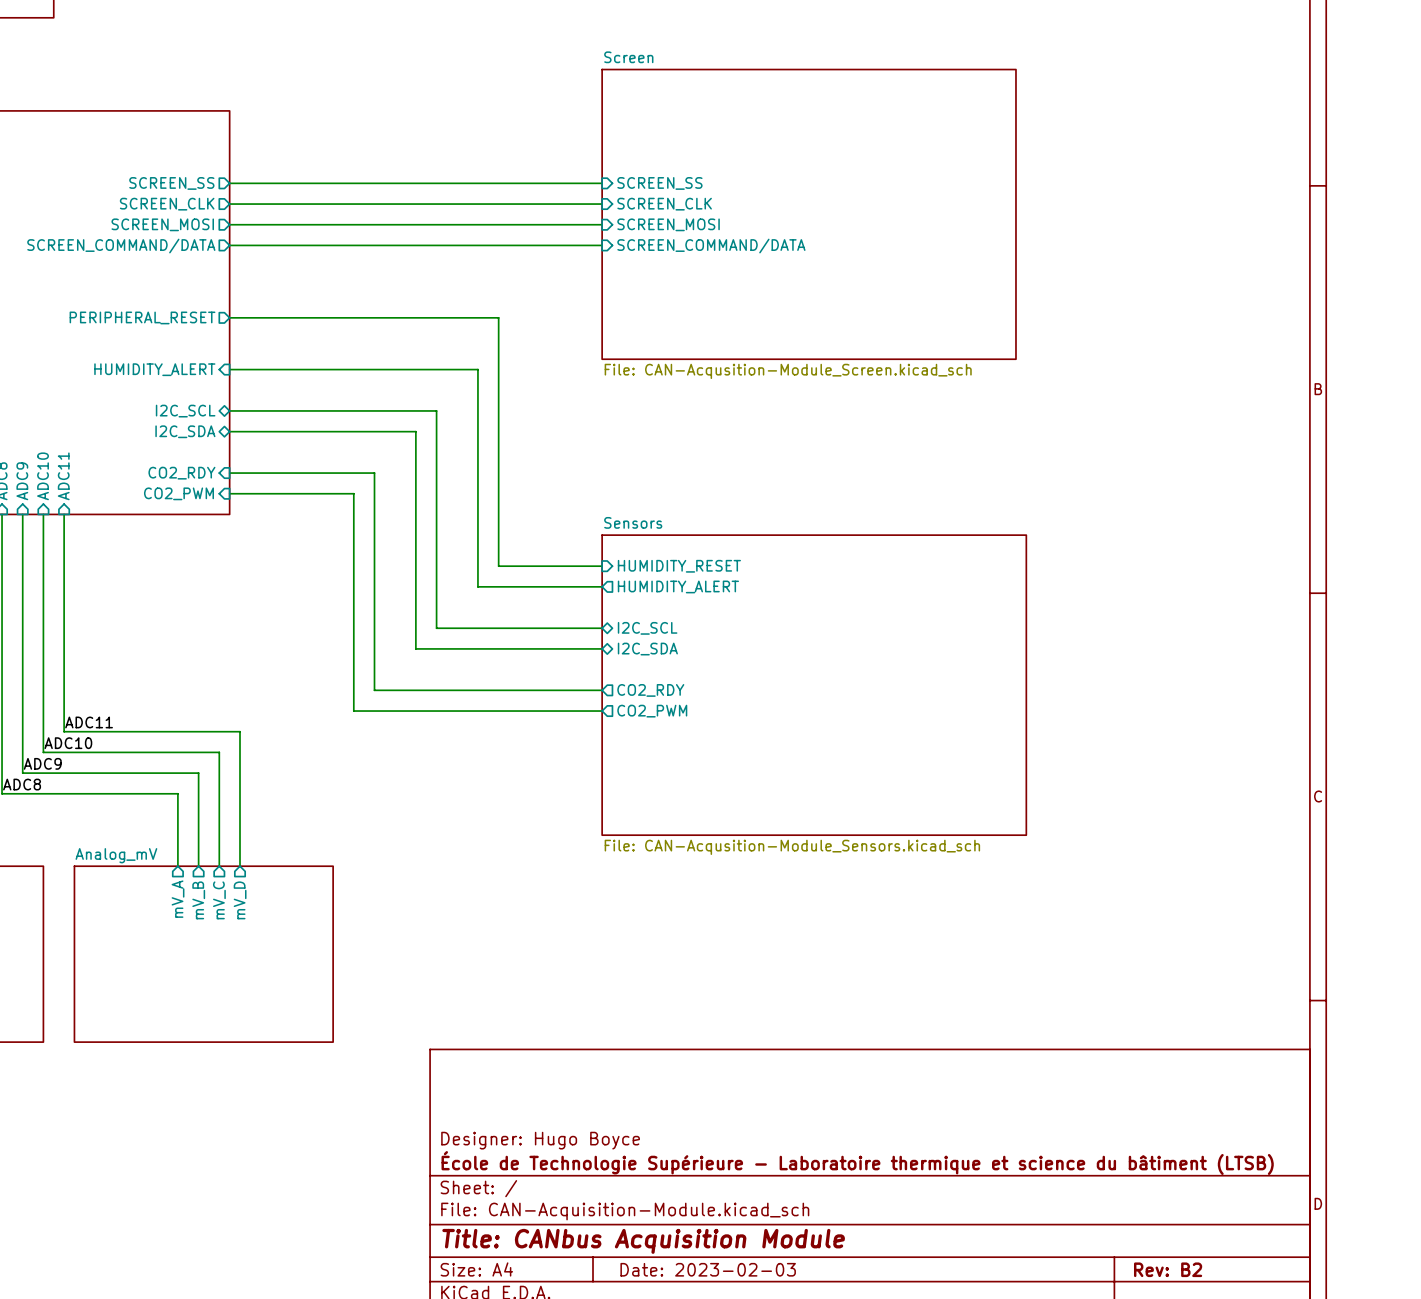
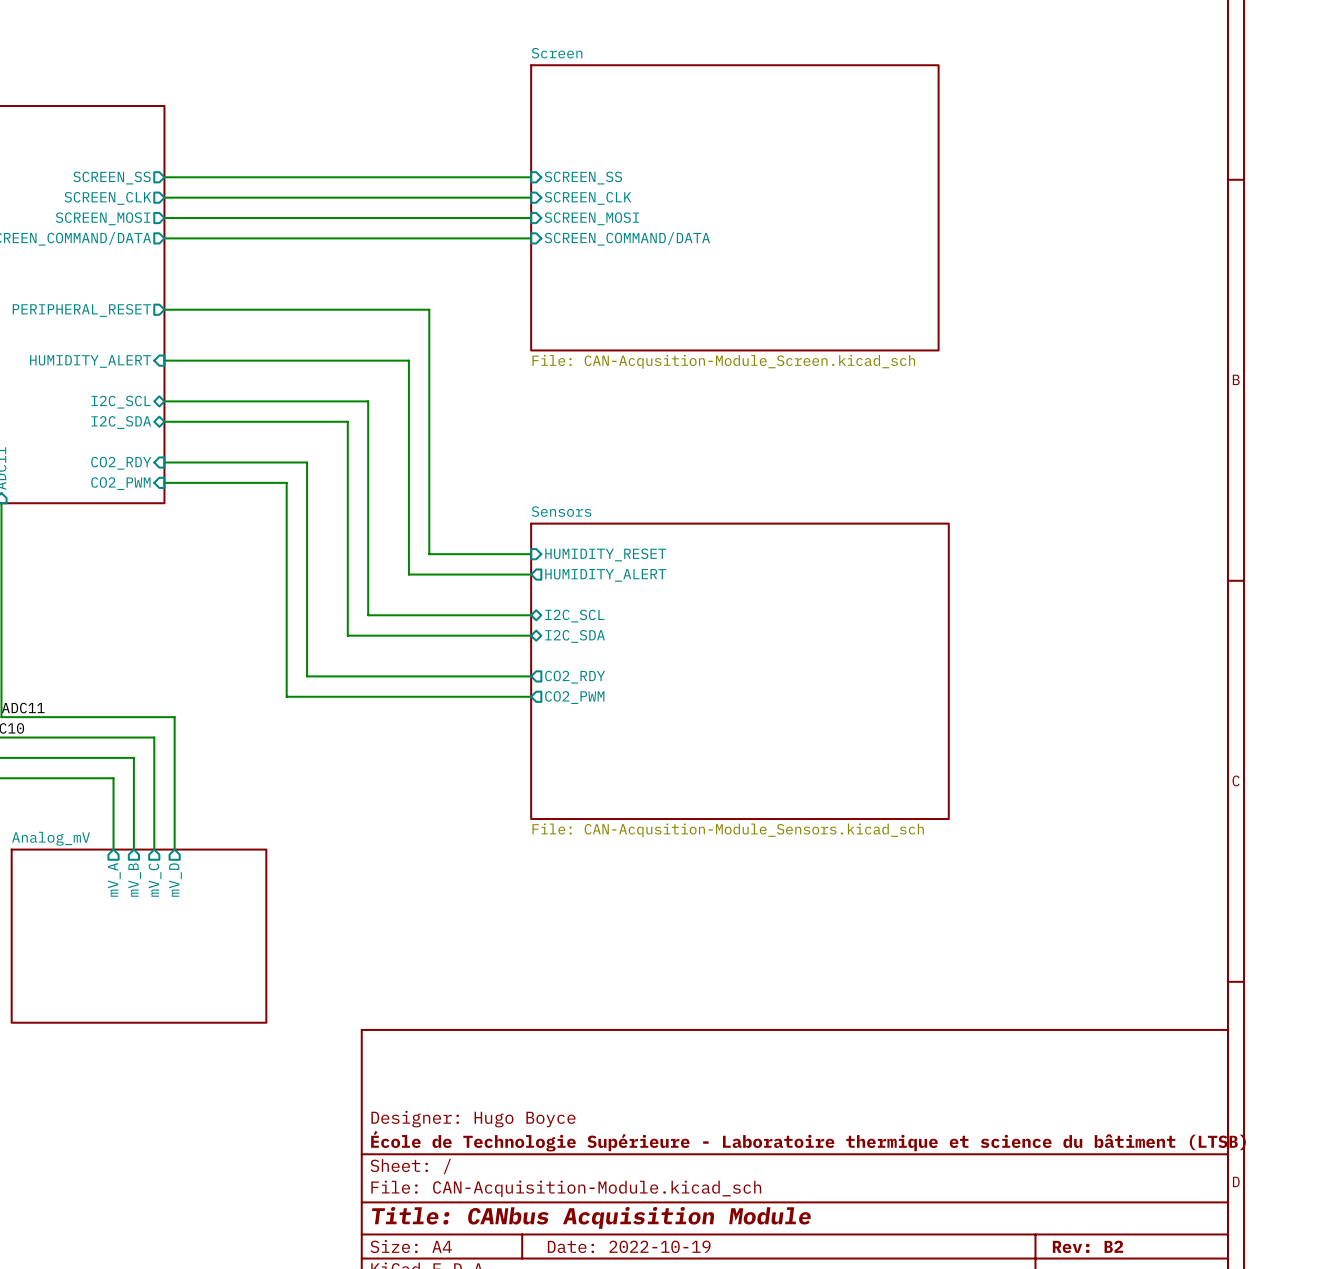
title block: Date: 2023-02-03 (708, 1269) -> Date: 2022-10-19 (629, 1246)

